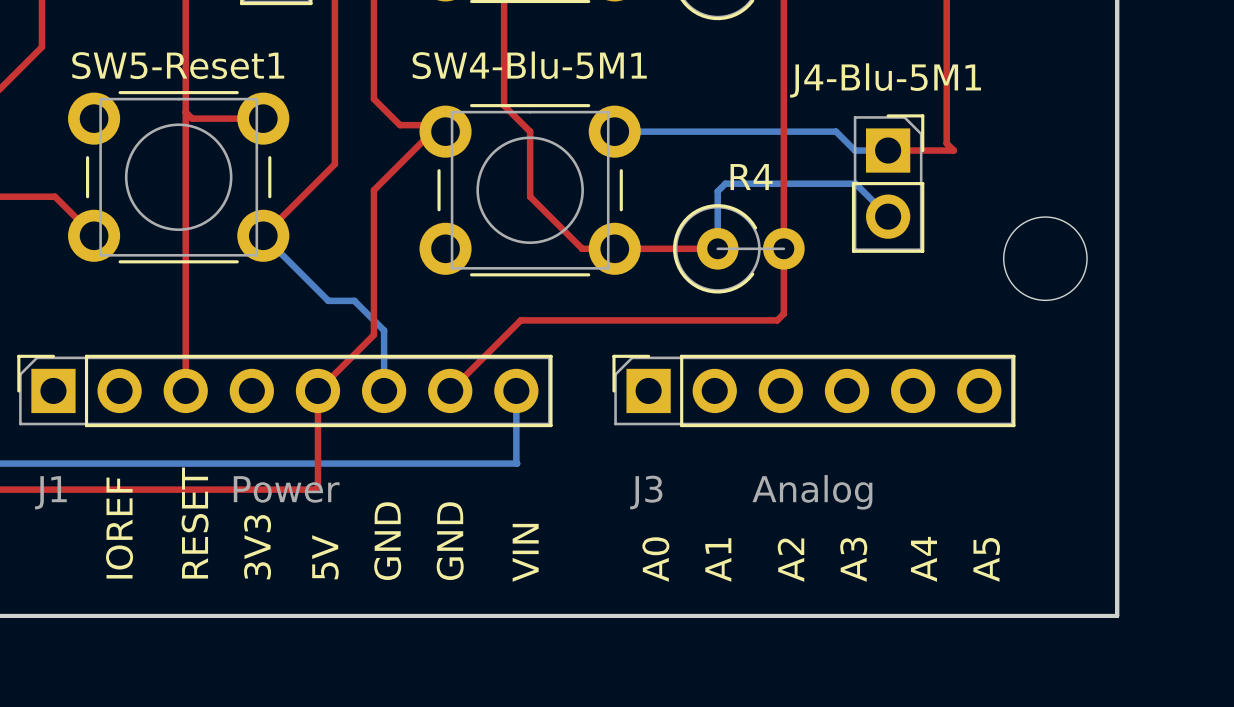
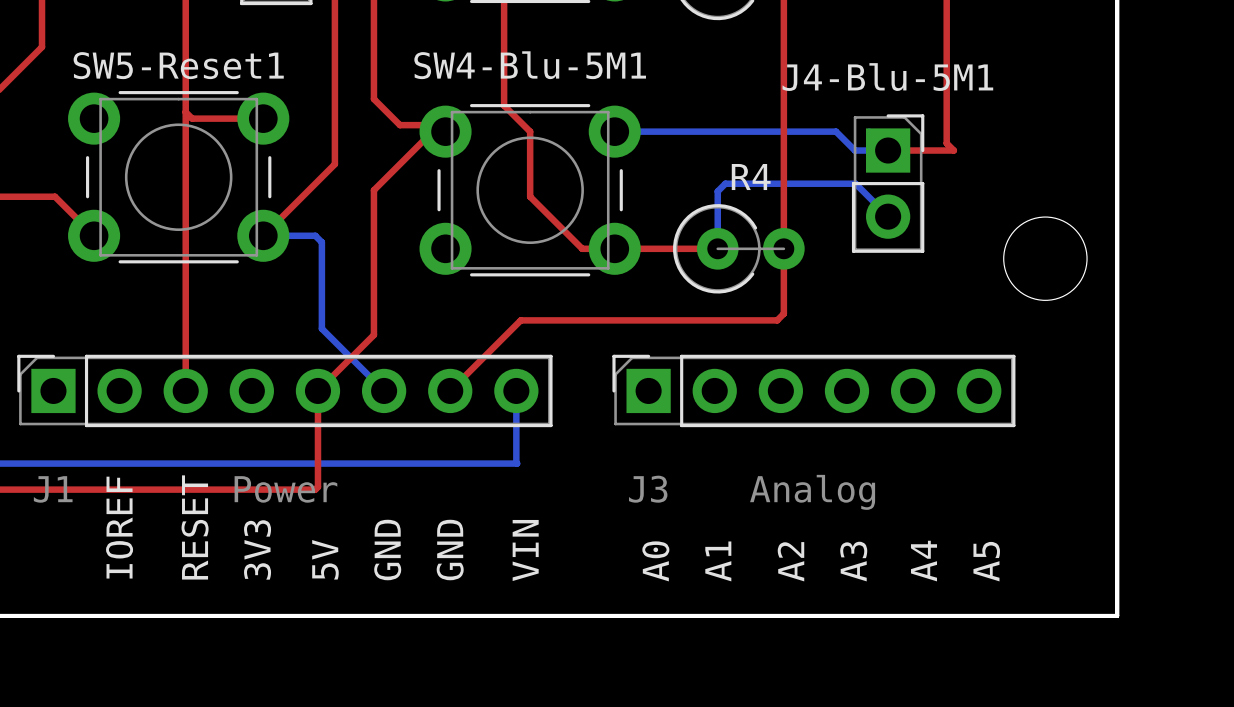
bottom track: (263, 235) (328, 300) (354, 300) (384, 330) (384, 390) -> (263, 235) (315, 235) (321, 242) (321, 328) (384, 390)

